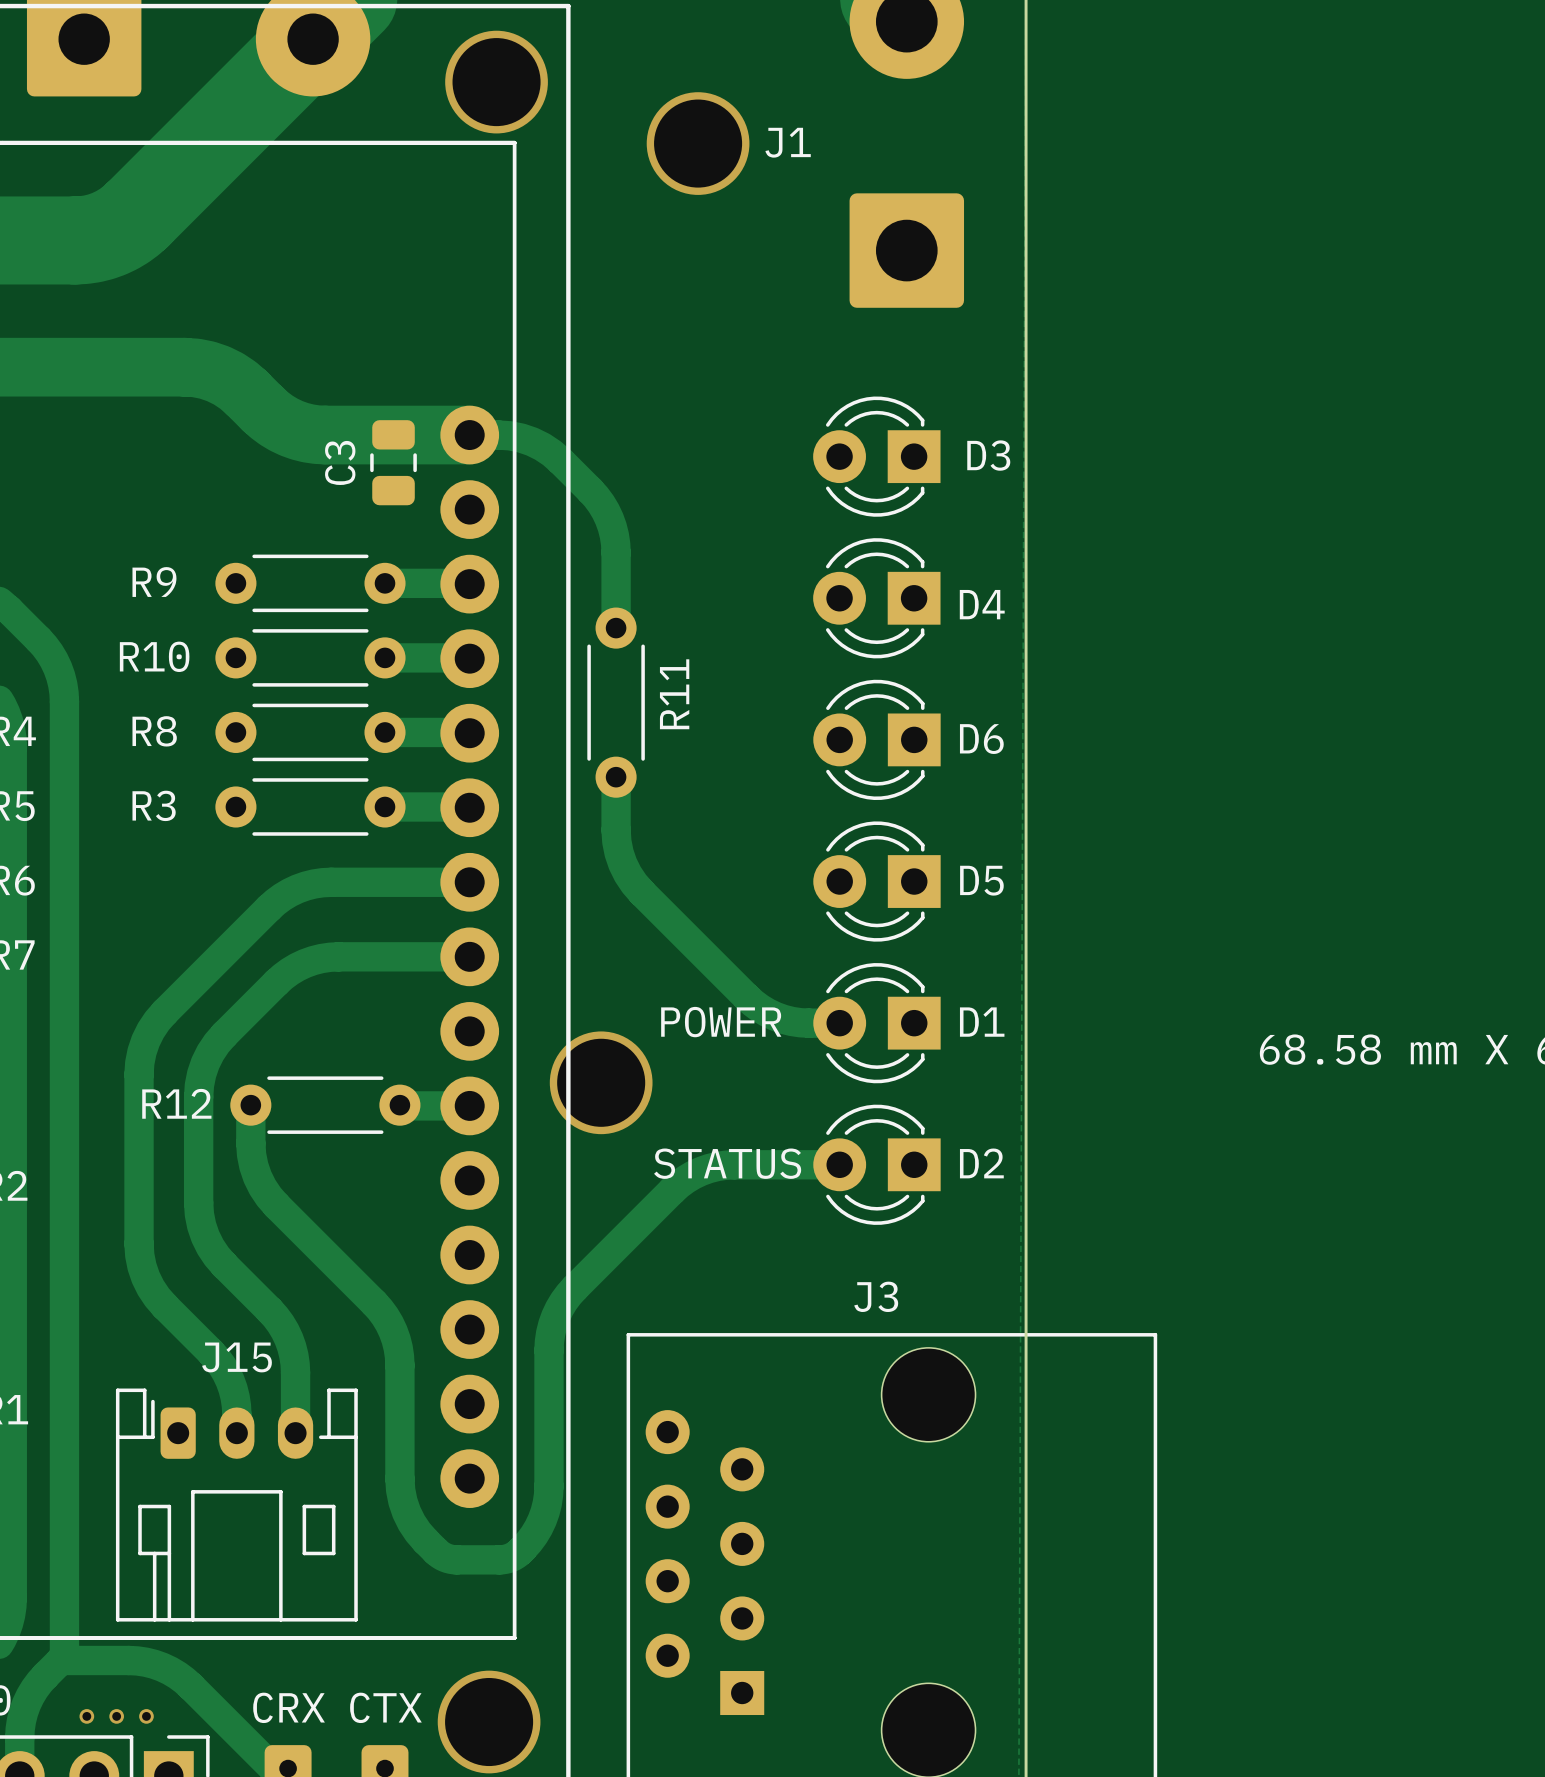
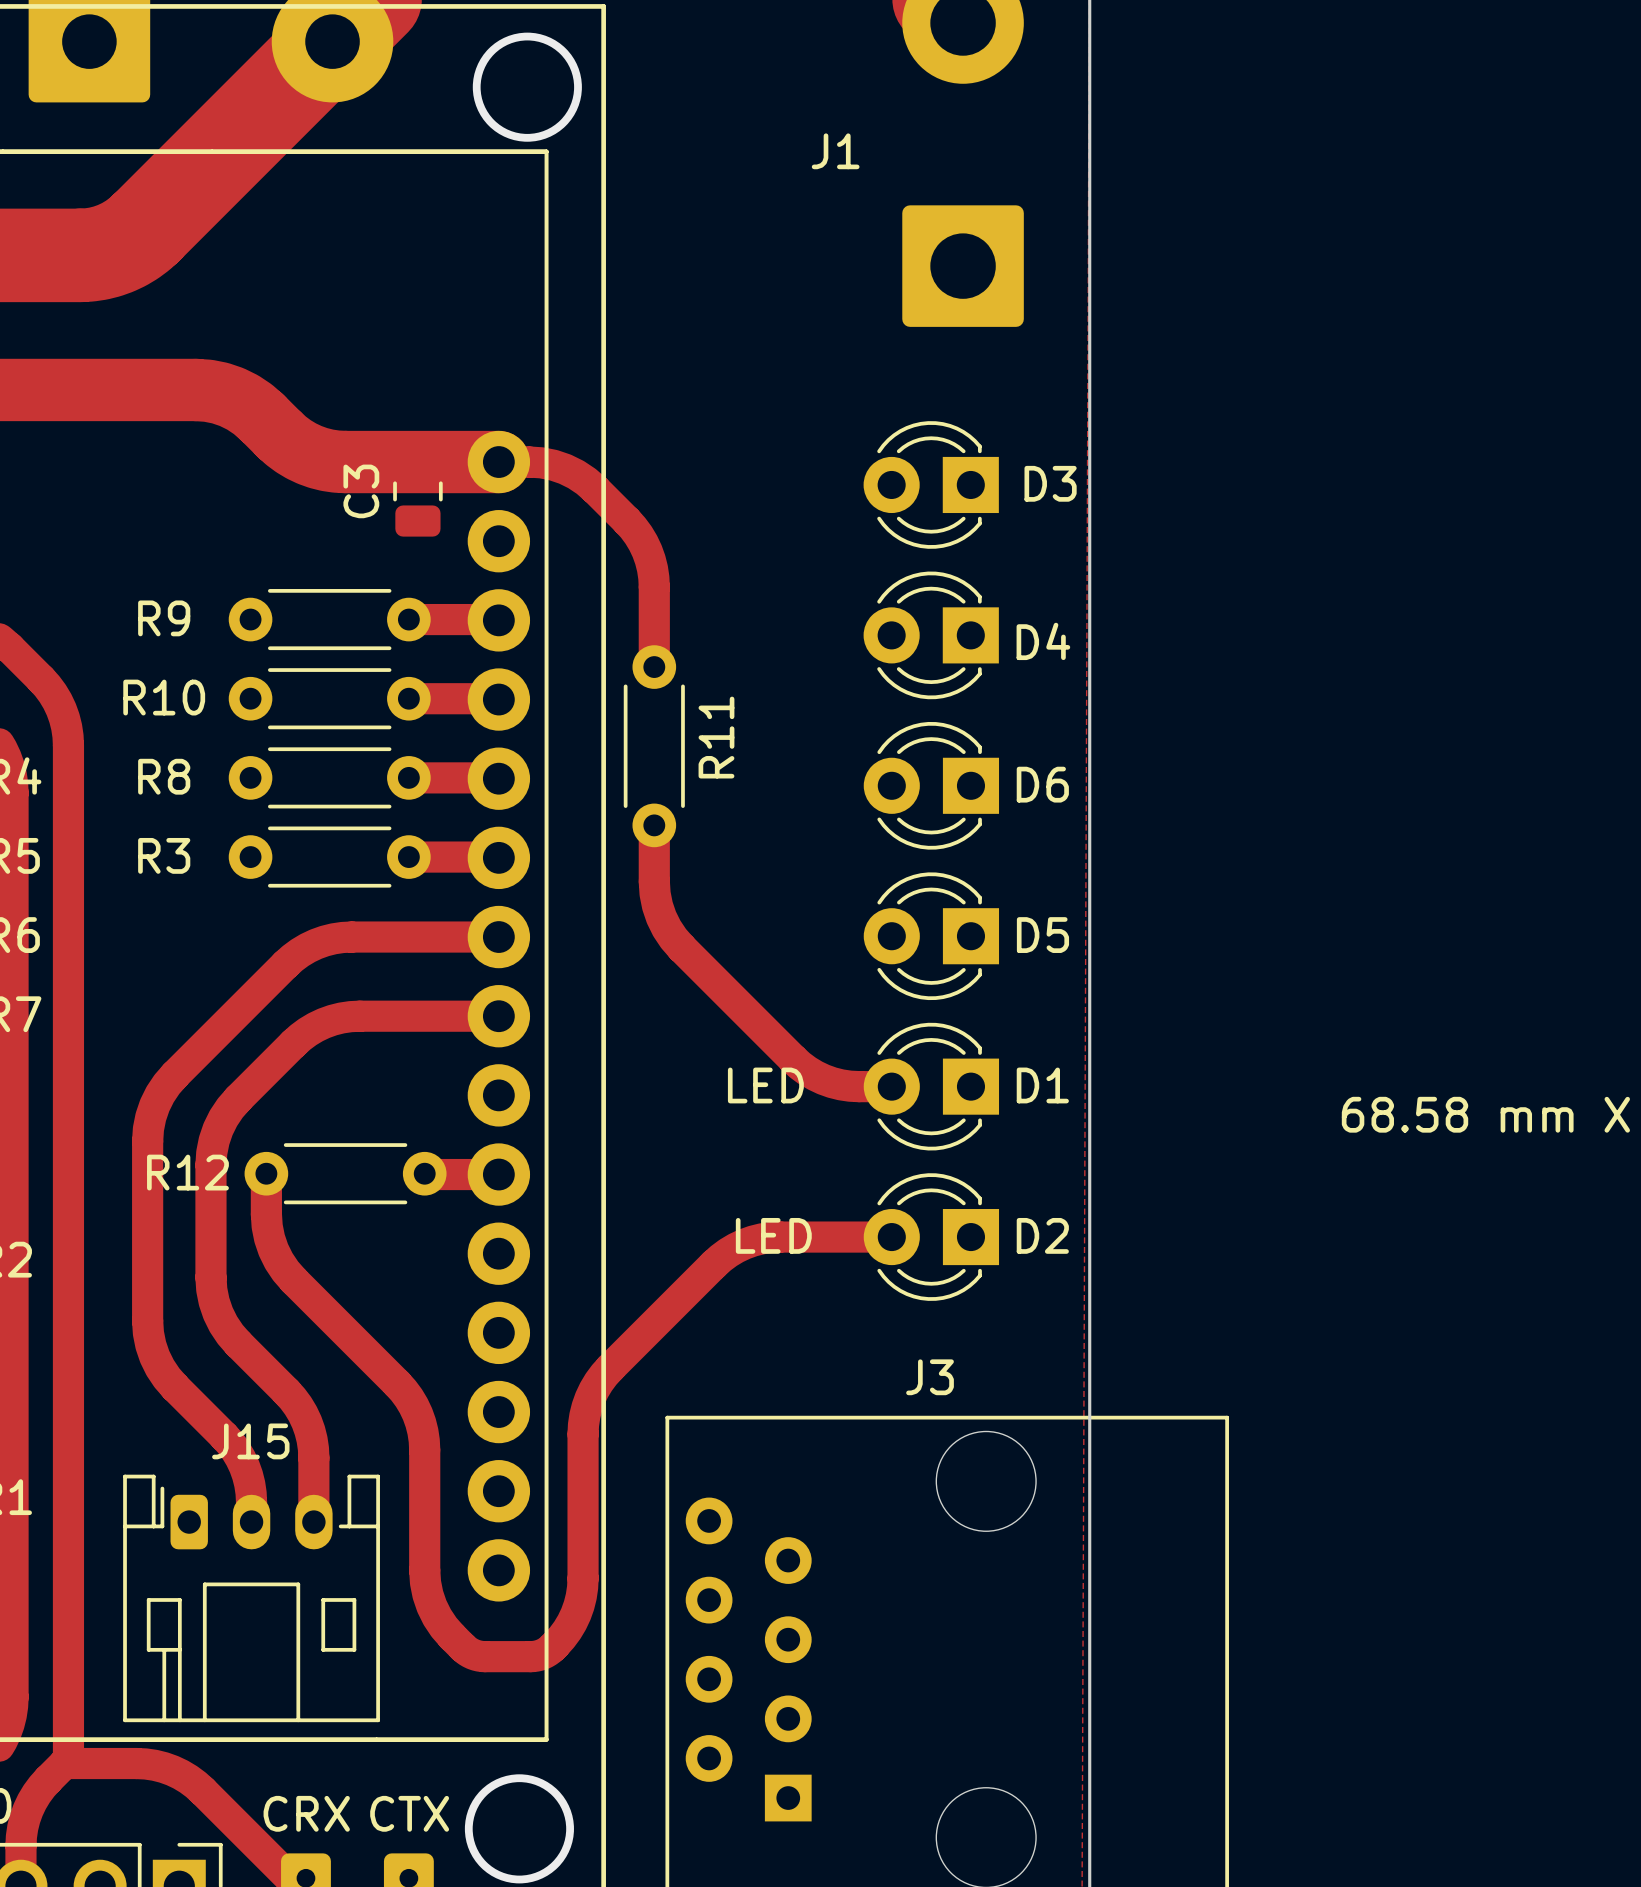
via: (698, 143) -> none
D1 value: POWER (721, 1022) -> LED (765, 1085)
via: (601, 1082) -> none
D2 value: STATUS (727, 1163) -> LED (773, 1235)
via: (86, 1716) -> none
via: (116, 1716) -> none
via: (146, 1716) -> none

